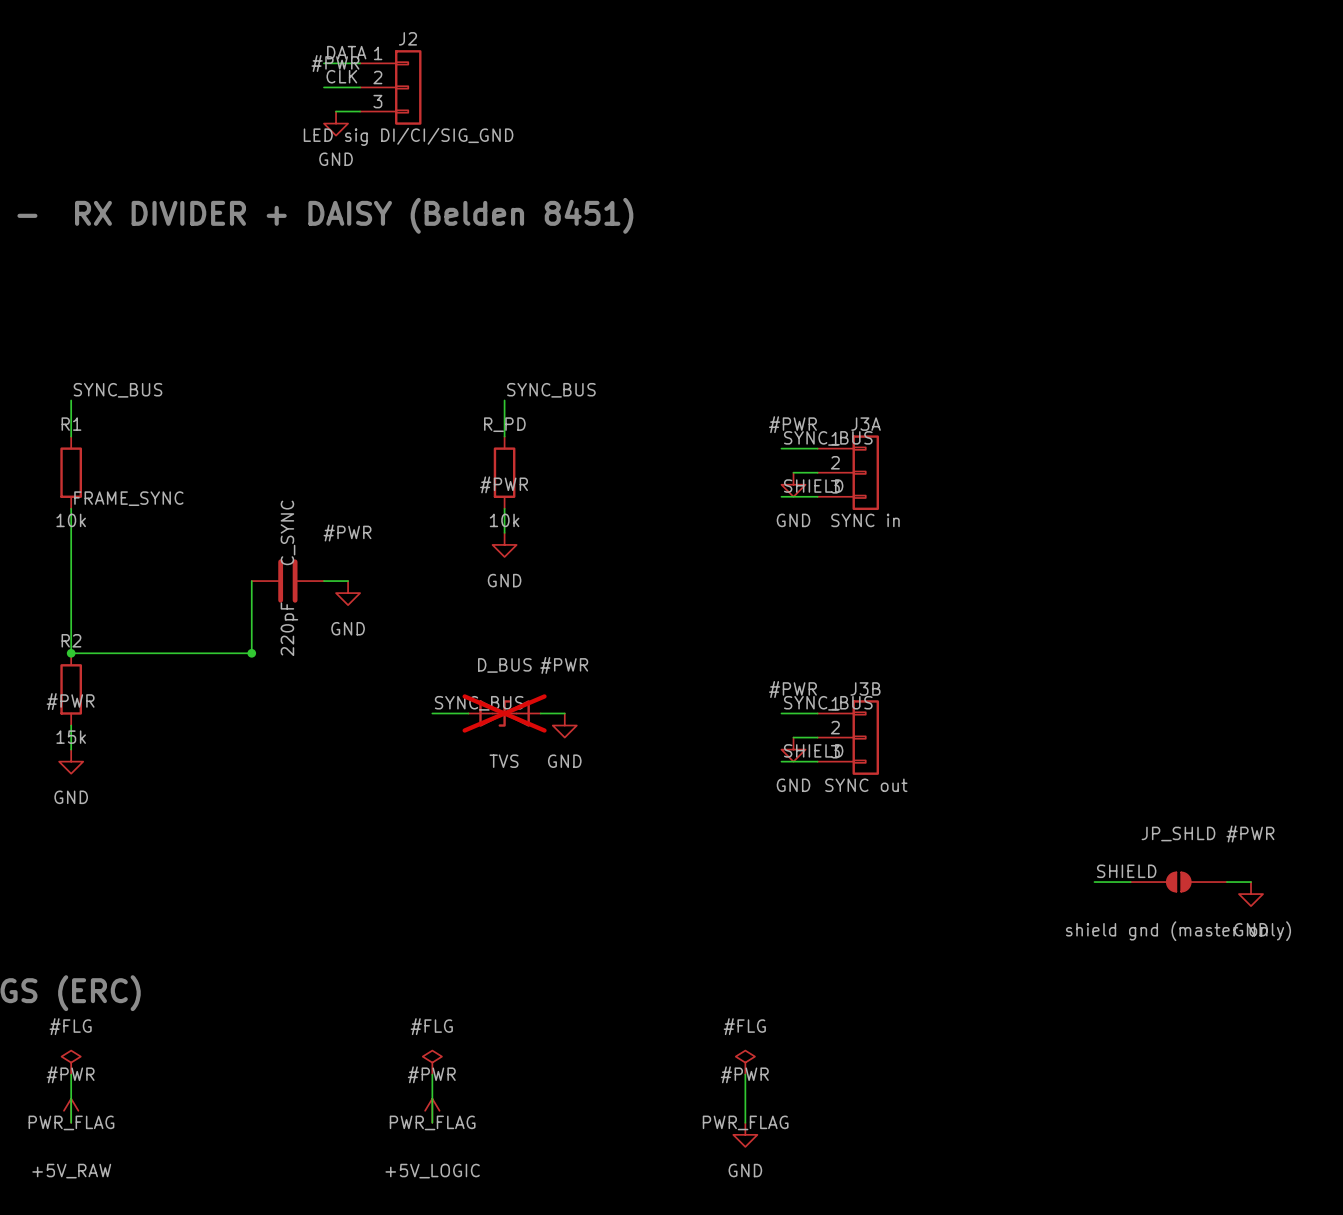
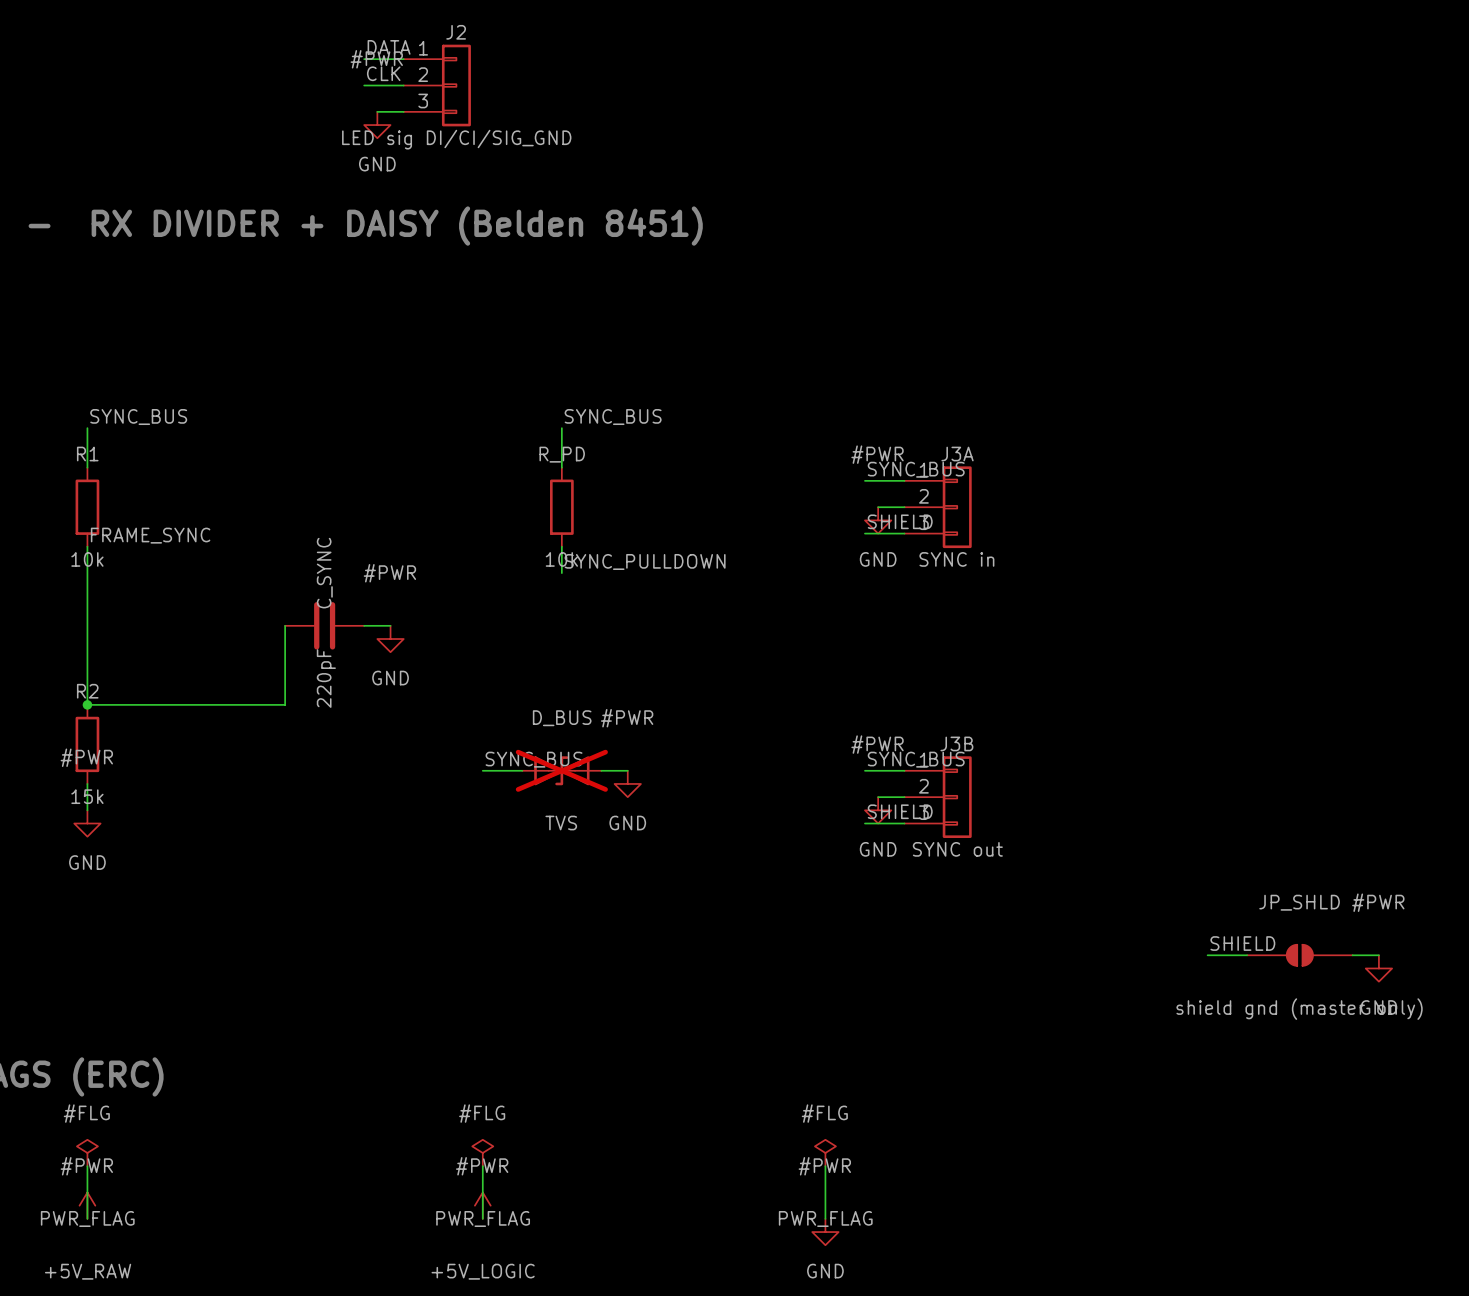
label: none -> SYNC_PULLDOWN (645, 561)
#PWR: GND (504, 544) -> none
junction: (251, 653) -> none

